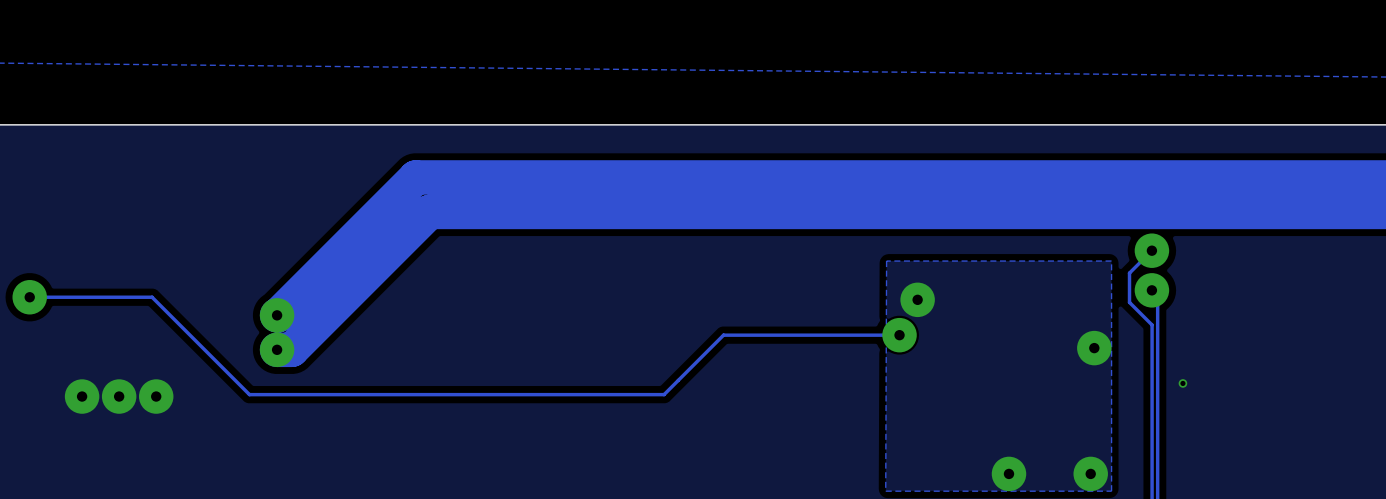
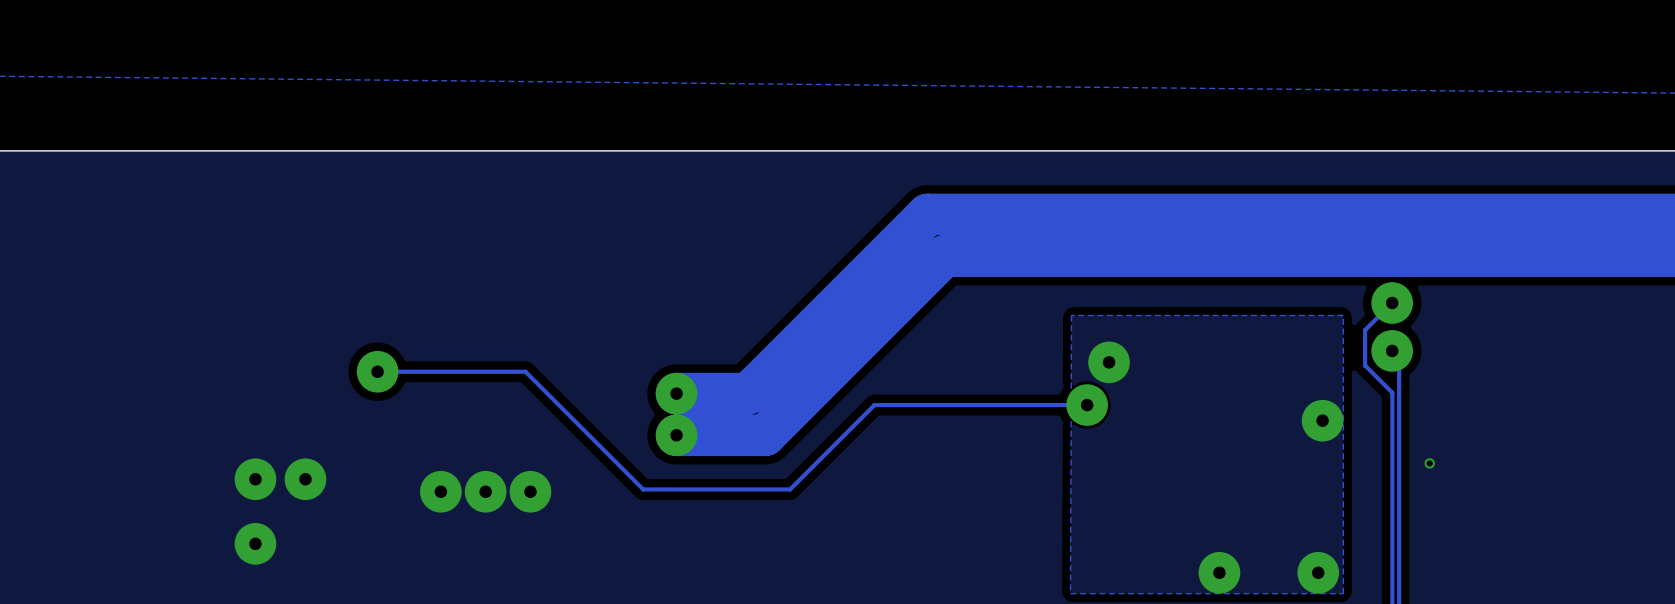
track: (767, 177) (415, 177) (277, 315) -> (927, 214) (748, 393) (676, 393)
track: (781, 211) (429, 211) (291, 349) (277, 349) -> (944, 256) (765, 435) (676, 435)
track: (29, 297) (152, 297) (249, 394) (664, 394) -> (377, 371) (525, 371) (643, 489) (790, 489) (802, 476)
via: (29, 297) -> none
via: none -> (377, 371)
via: (277, 315) -> none
via: none -> (676, 393)
via: (277, 349) -> none
via: none -> (676, 435)
via: (82, 396) -> none
via: (119, 396) -> none
via: (156, 396) -> none
via: none -> (255, 479)
via: none -> (305, 479)
via: none -> (440, 491)
via: none -> (485, 491)
via: none -> (530, 491)
via: none -> (255, 543)

